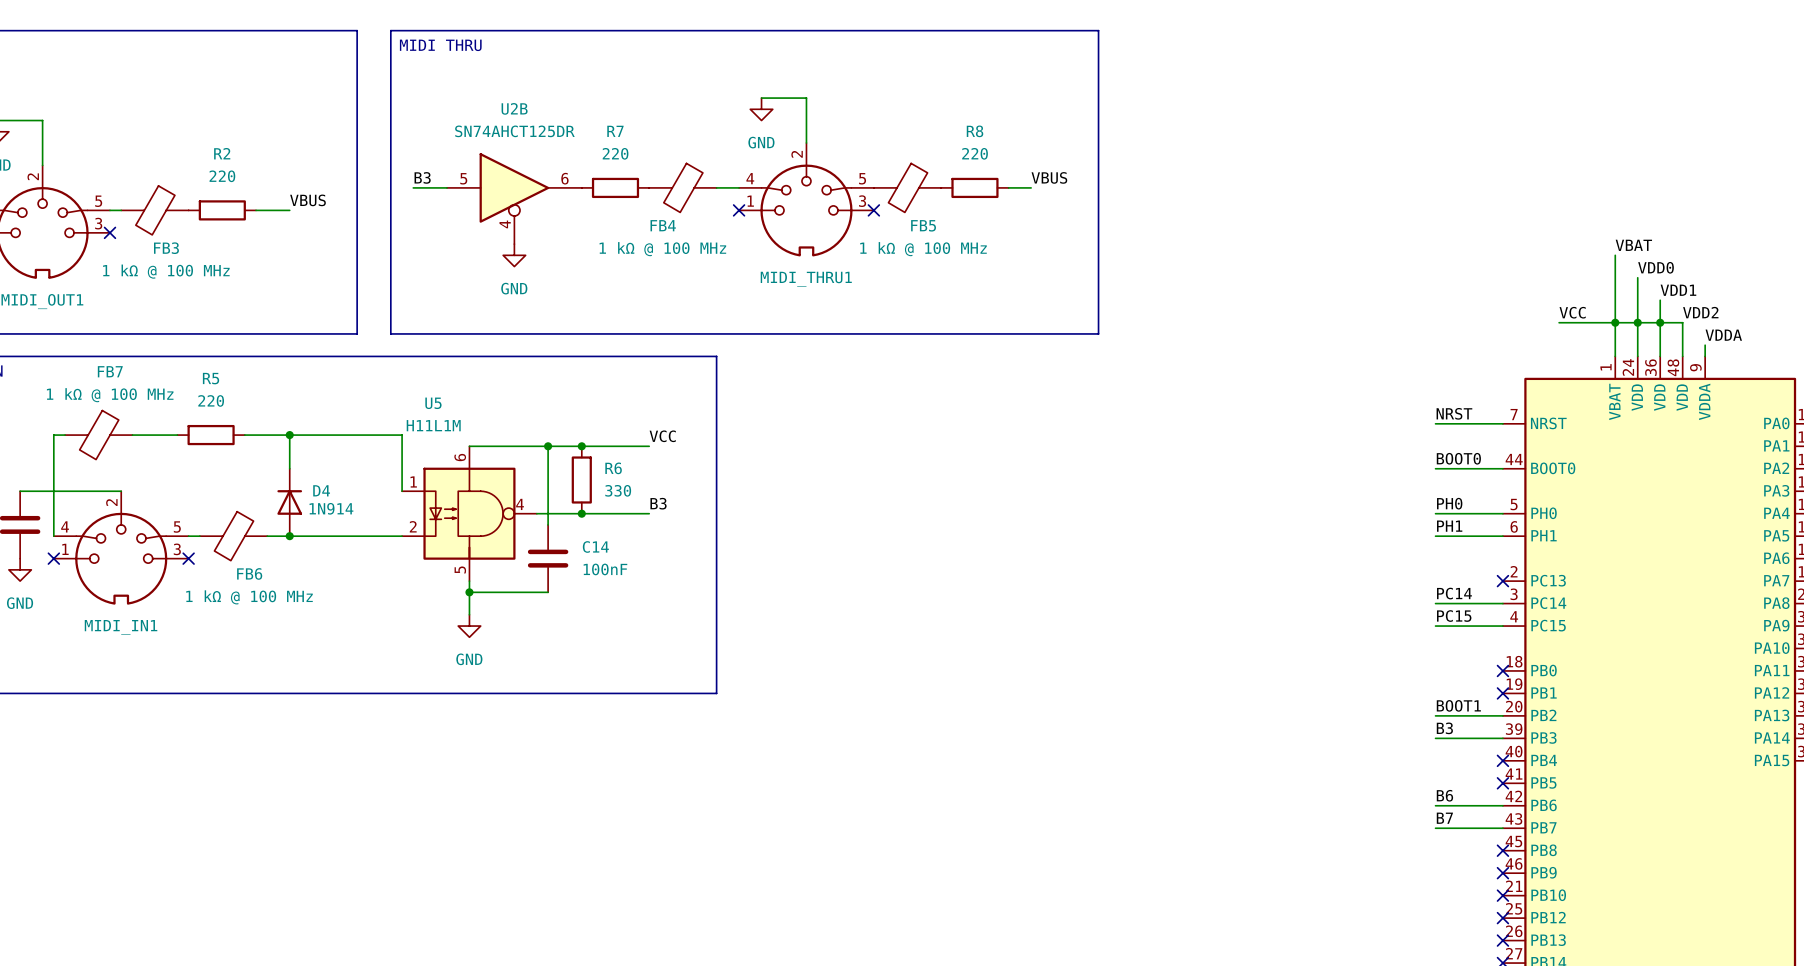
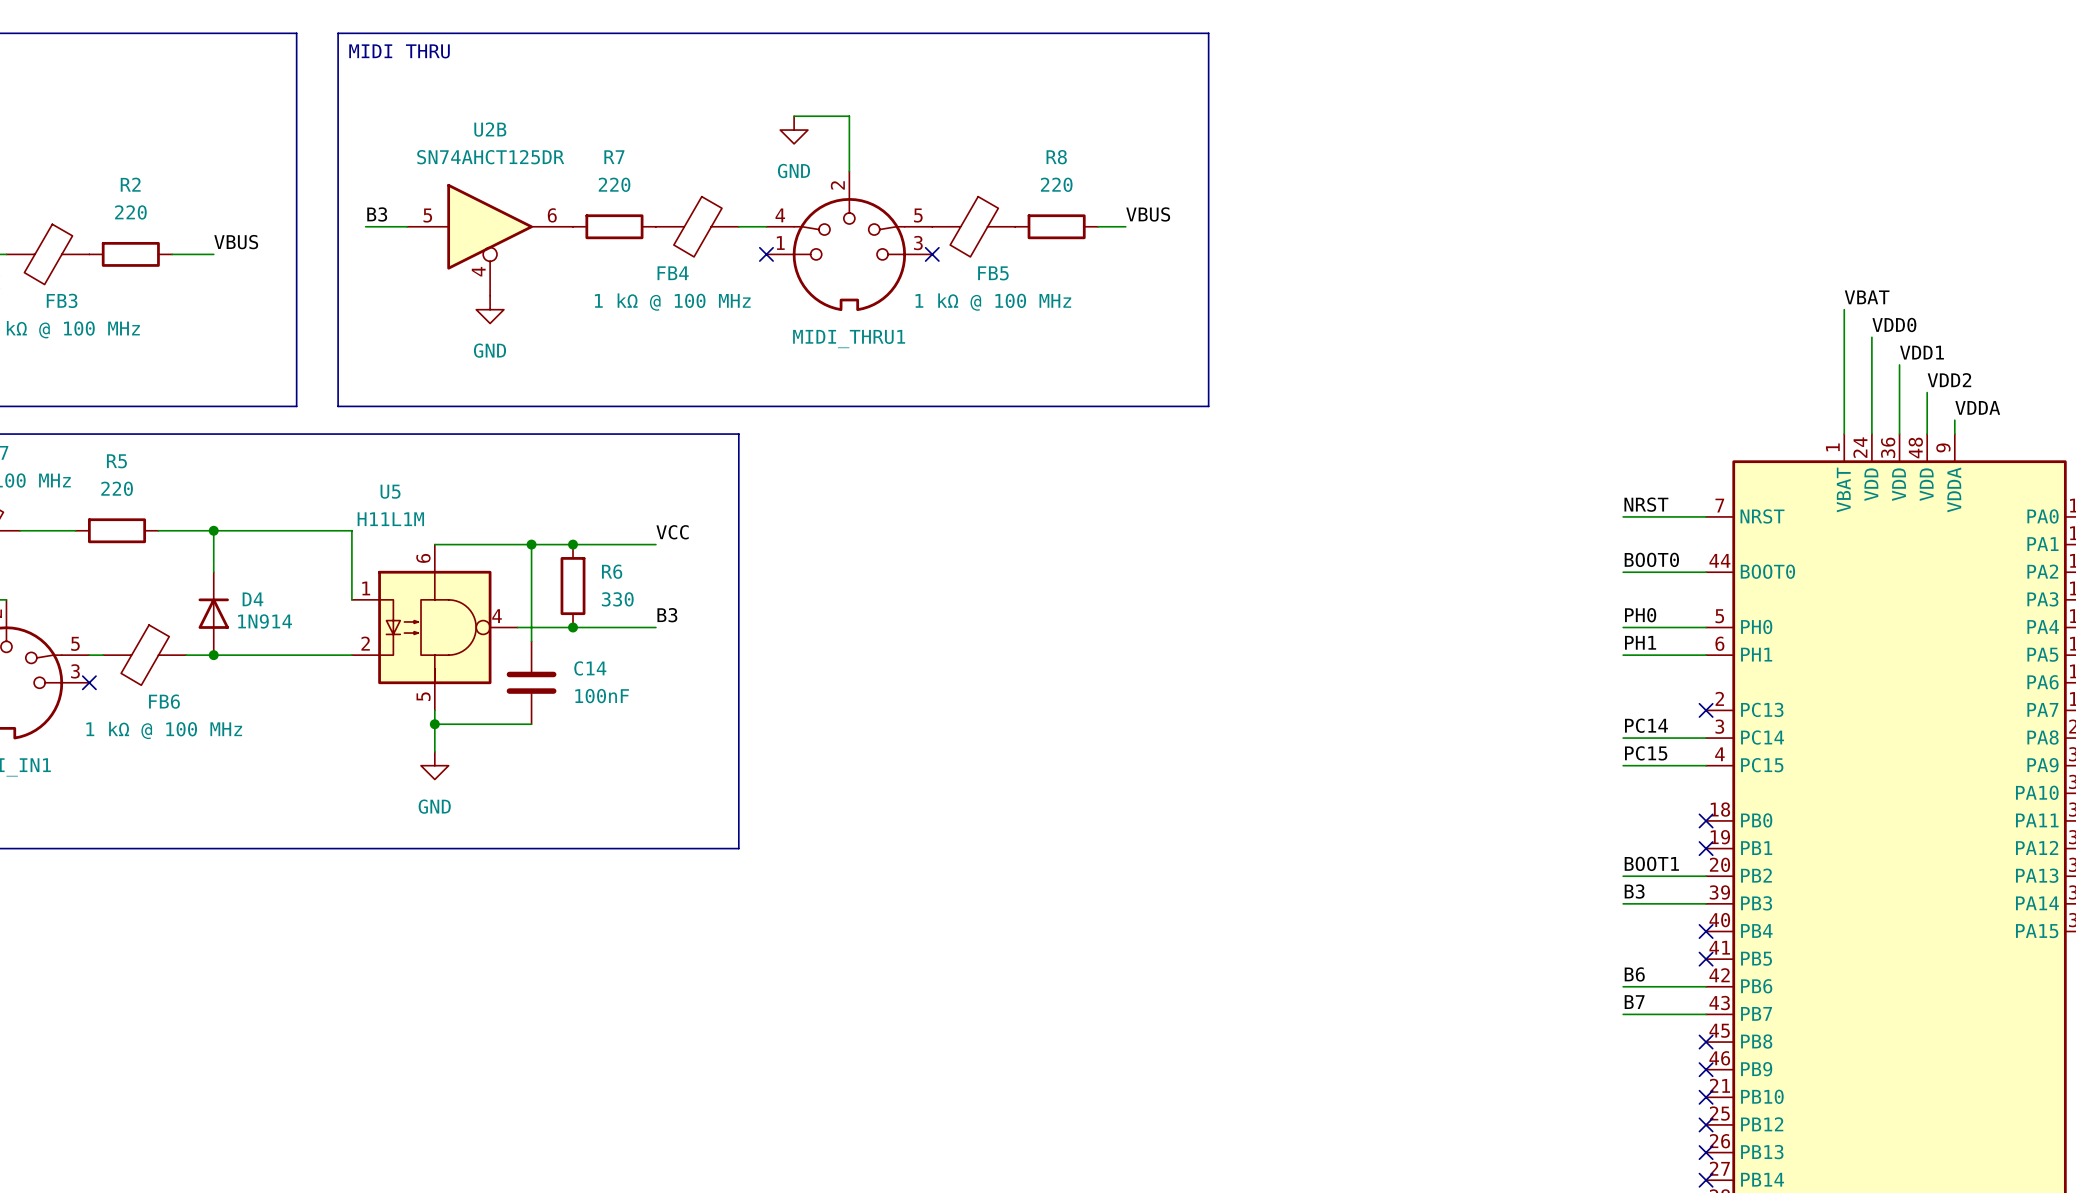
label: VCC (1572, 312) -> none
wire: (1559, 322) (1682, 322) -> none
junction: (1615, 322) -> none
junction: (1637, 322) -> none
junction: (1660, 322) -> none

